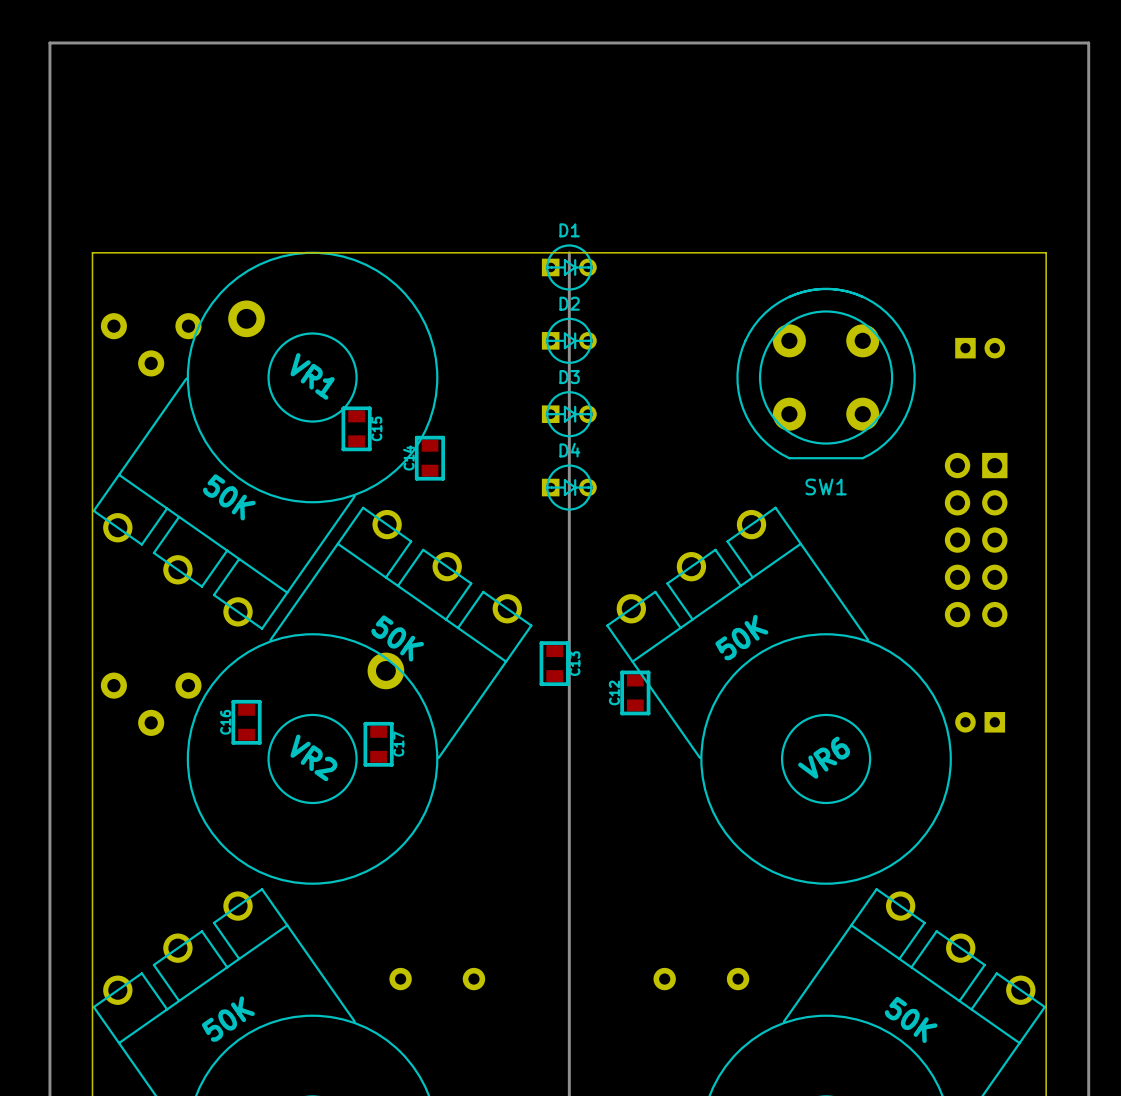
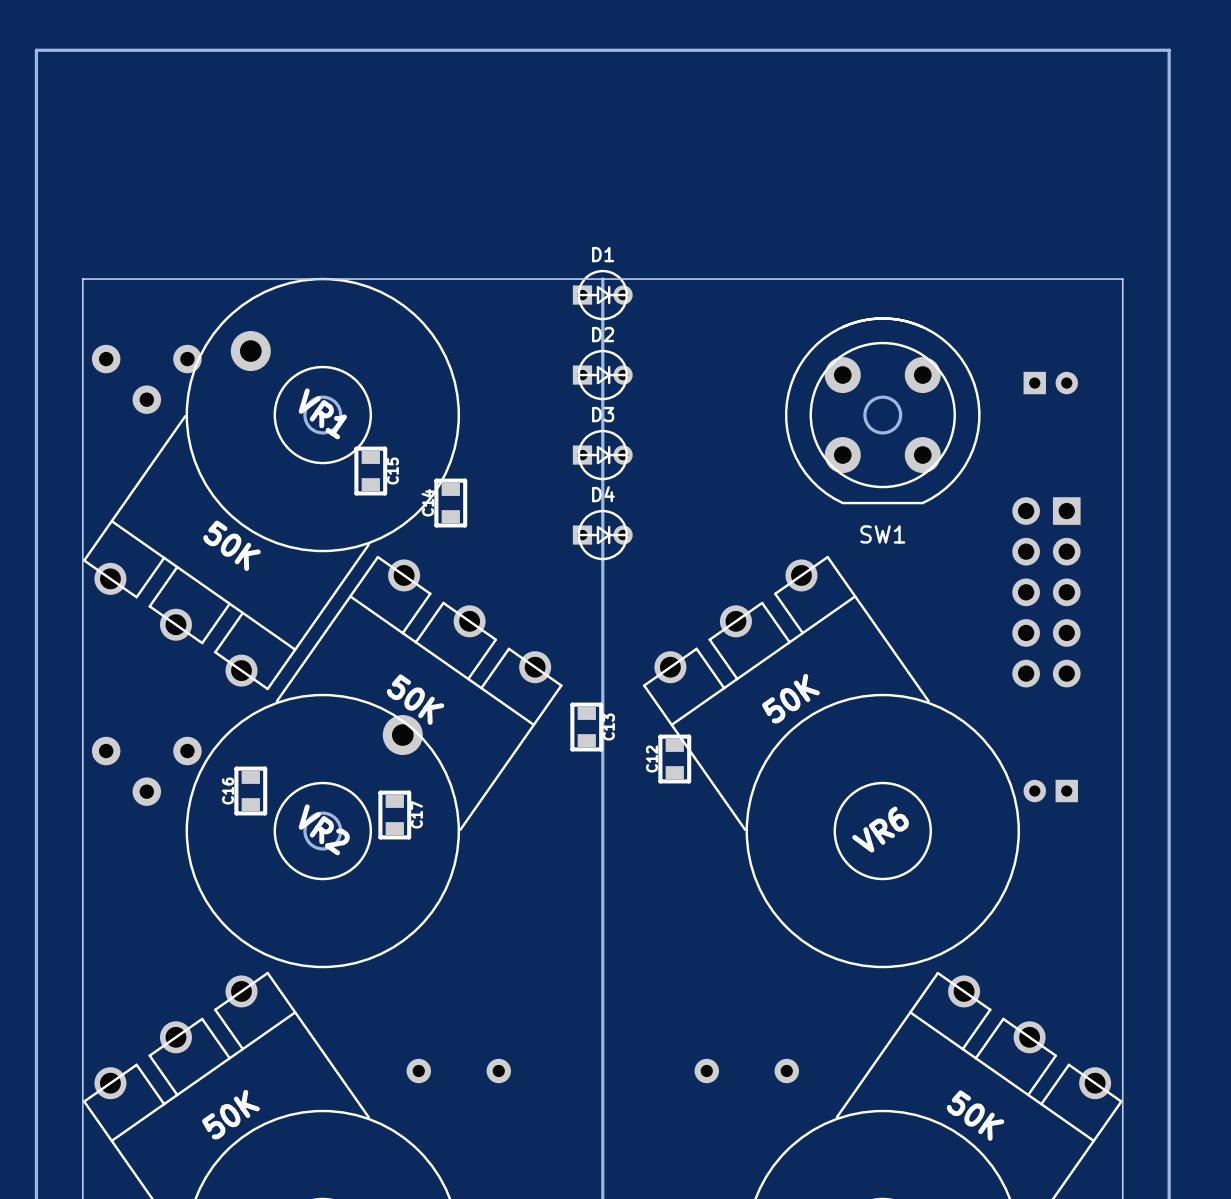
drawing: none -> [303, 395, 343, 435]
drawing: none -> [863, 395, 903, 435]
drawing: none -> [303, 811, 343, 851]

